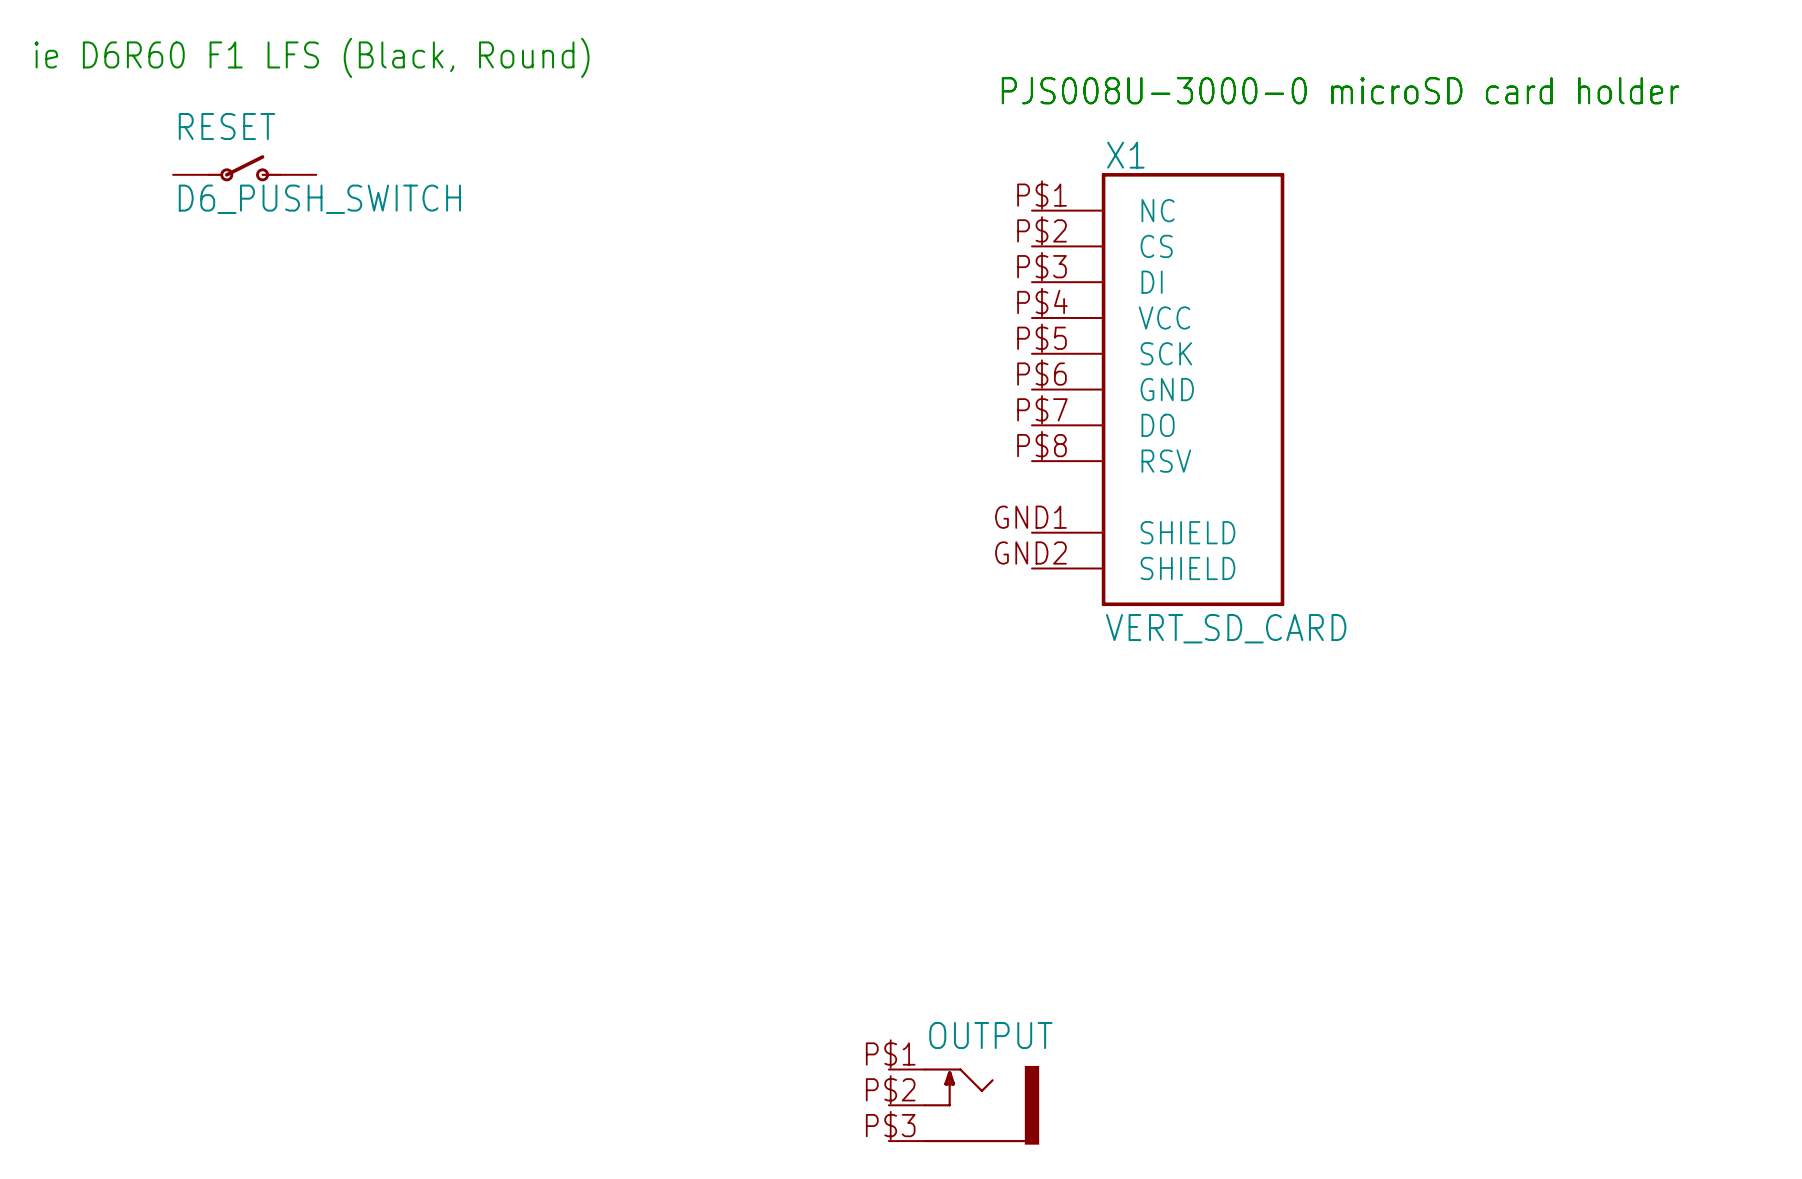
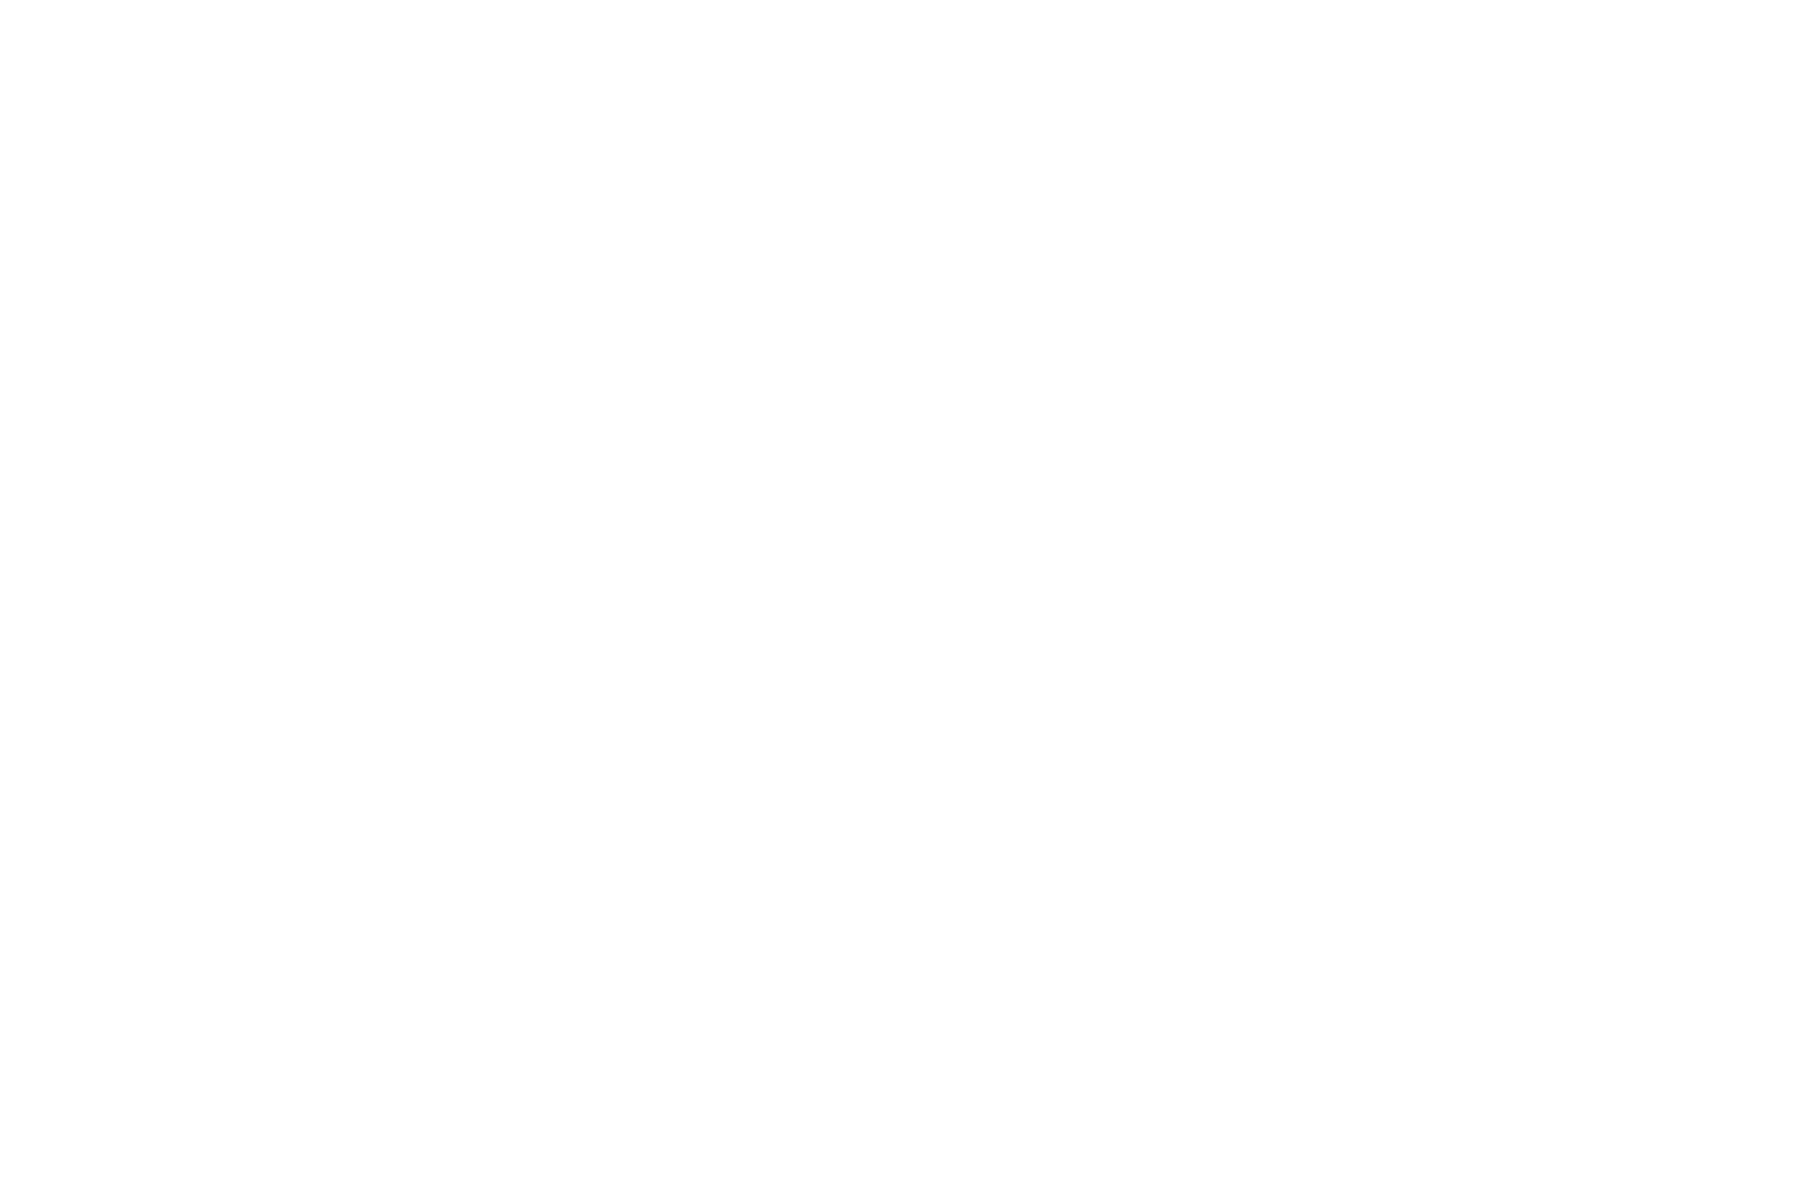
text: ie D6R60 F1 LFS (Black, Round) (312, 57) -> none
text: PJS008U-3000-0 microSD card holder (1340, 90) -> none
RESET: D6_PUSH_SWITCH (244, 168) -> none
X1: VERT_SD_CARD (1158, 389) -> none
OUTPUT: (963, 1105) -> none

